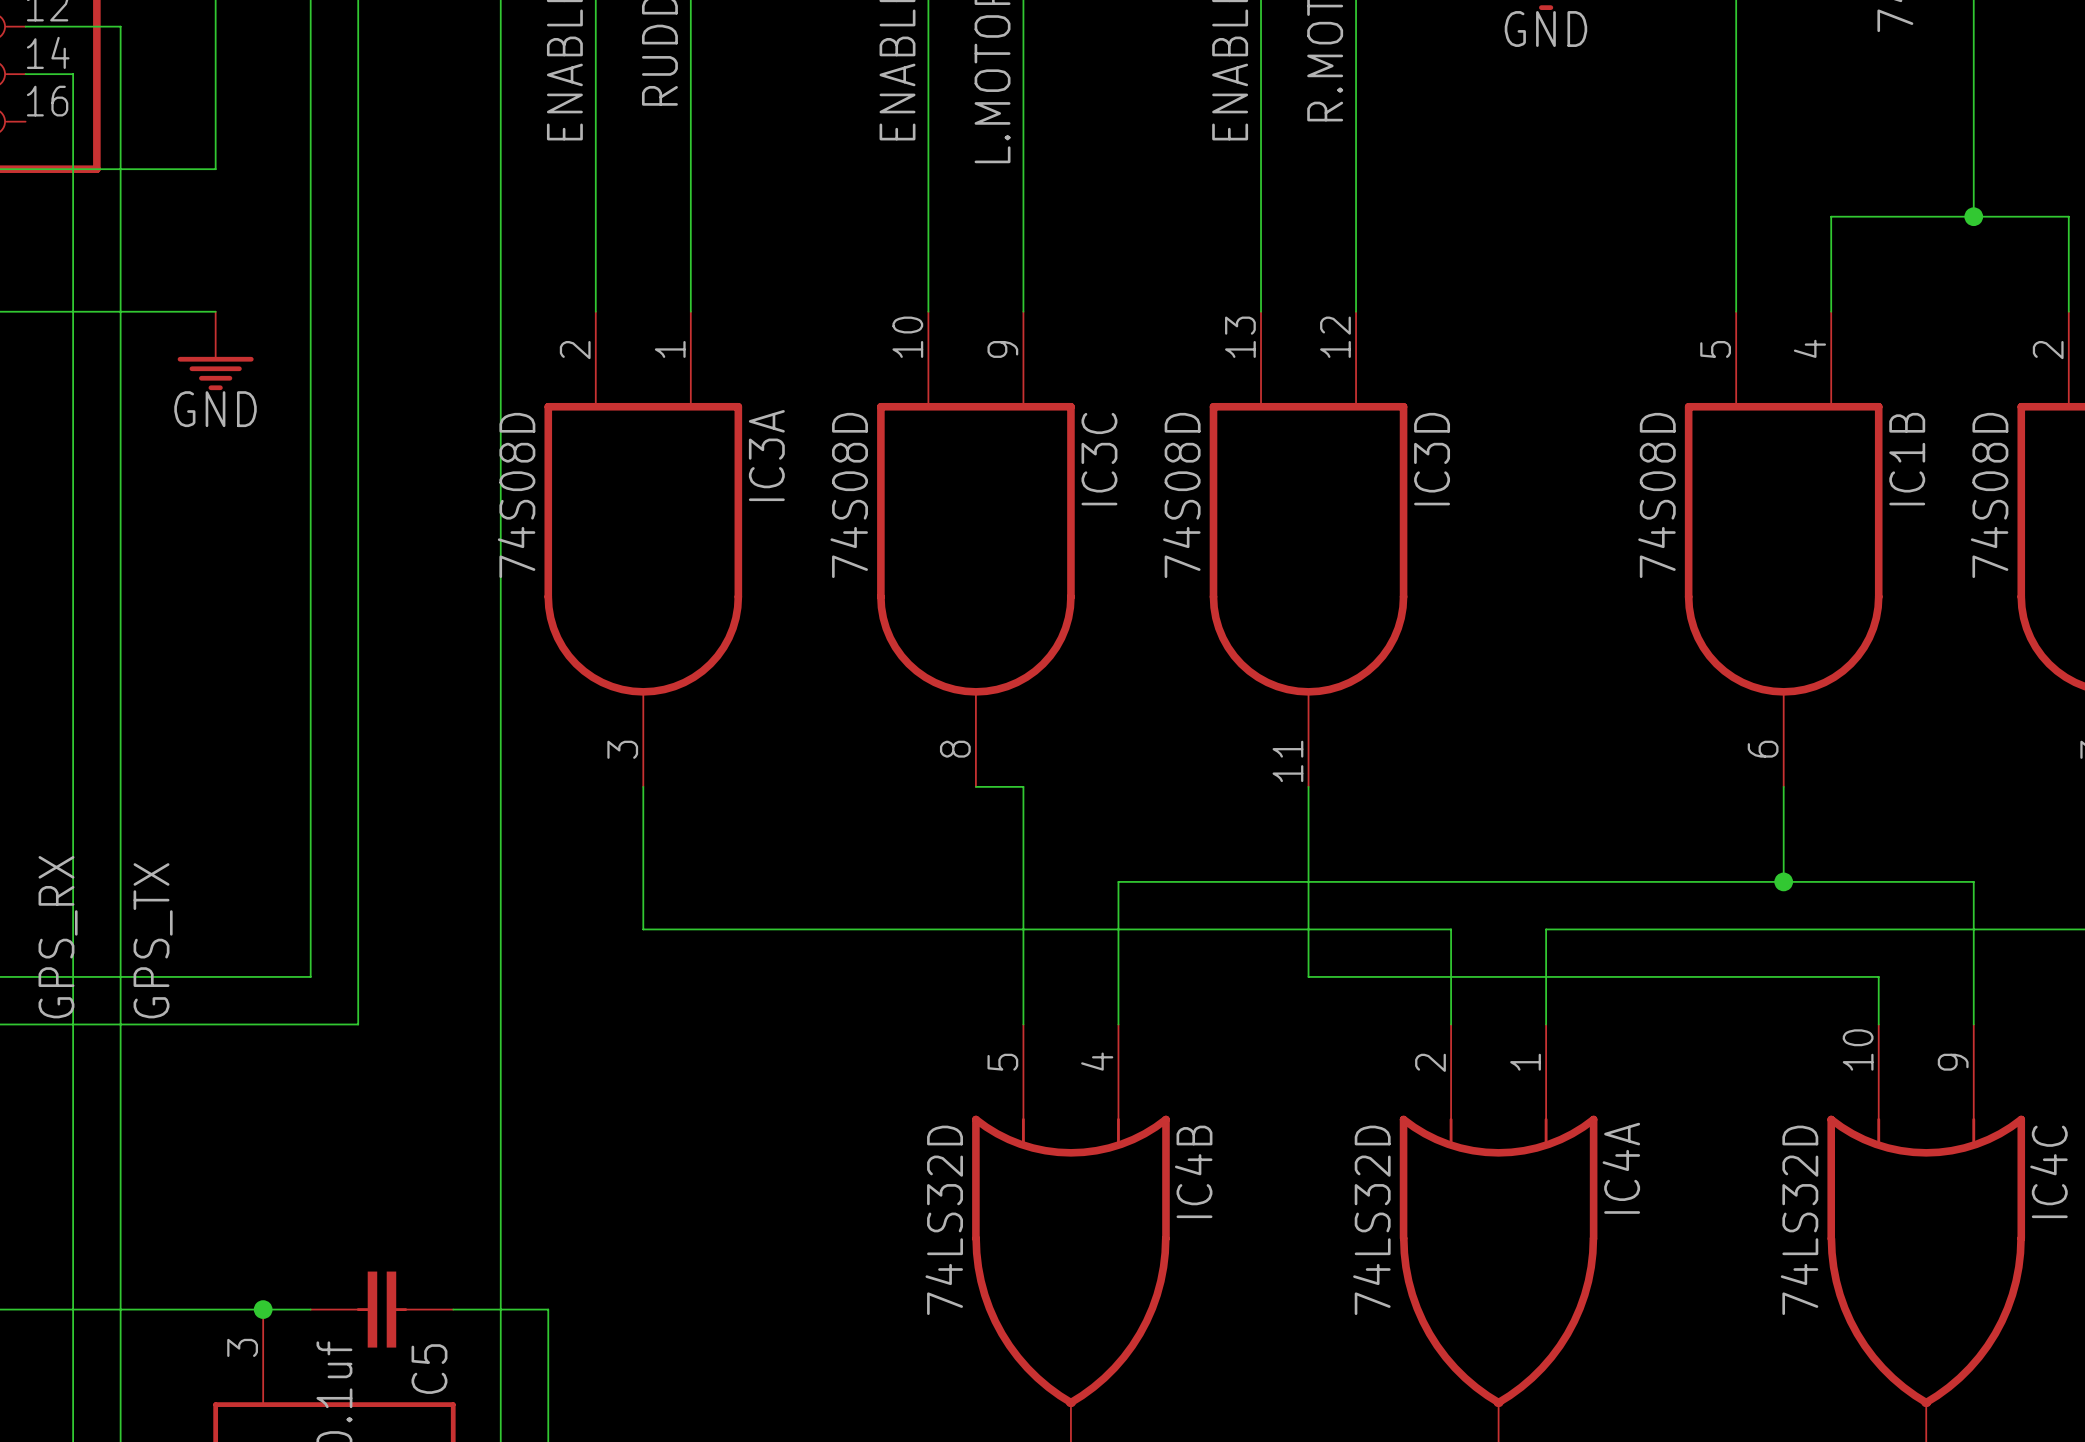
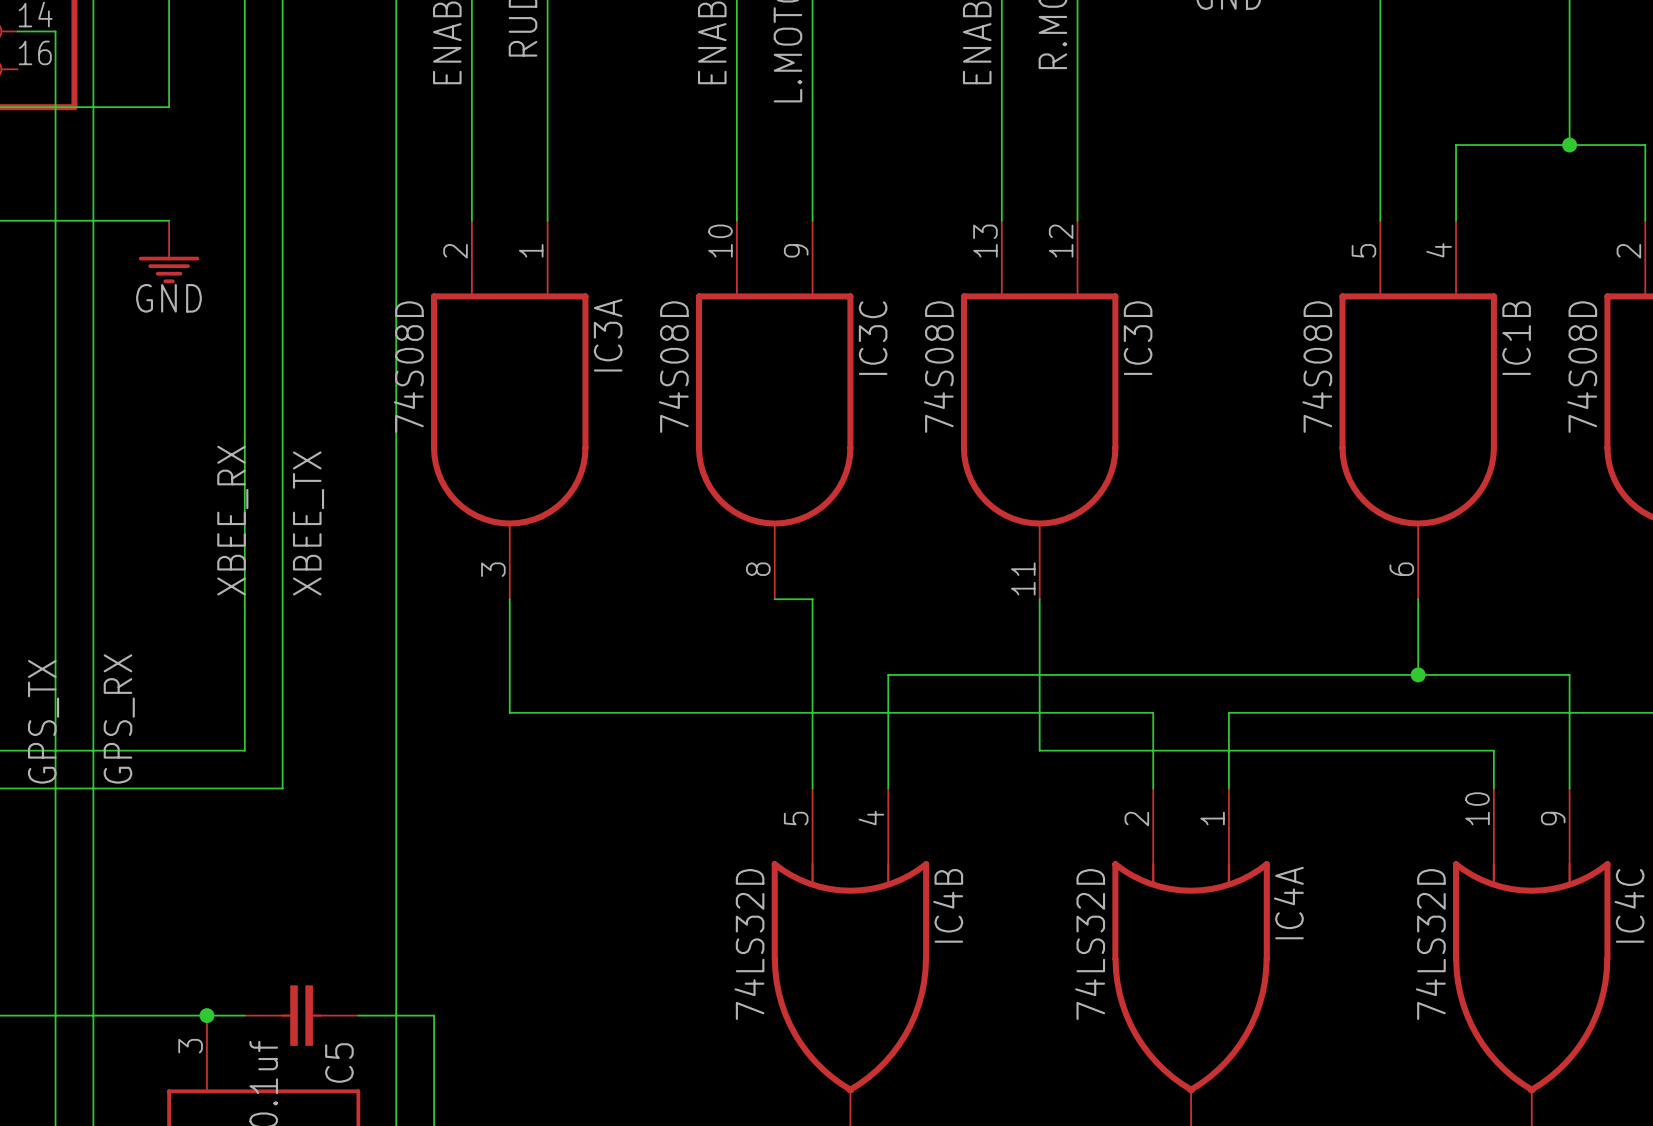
label: none -> XBEE_RX (232, 520)
label: none -> XBEE_TX (308, 523)
label: GPS_RX (58, 937) -> GPS_TX (43, 721)
label: GPS_TX (153, 940) -> GPS_RX (119, 718)

